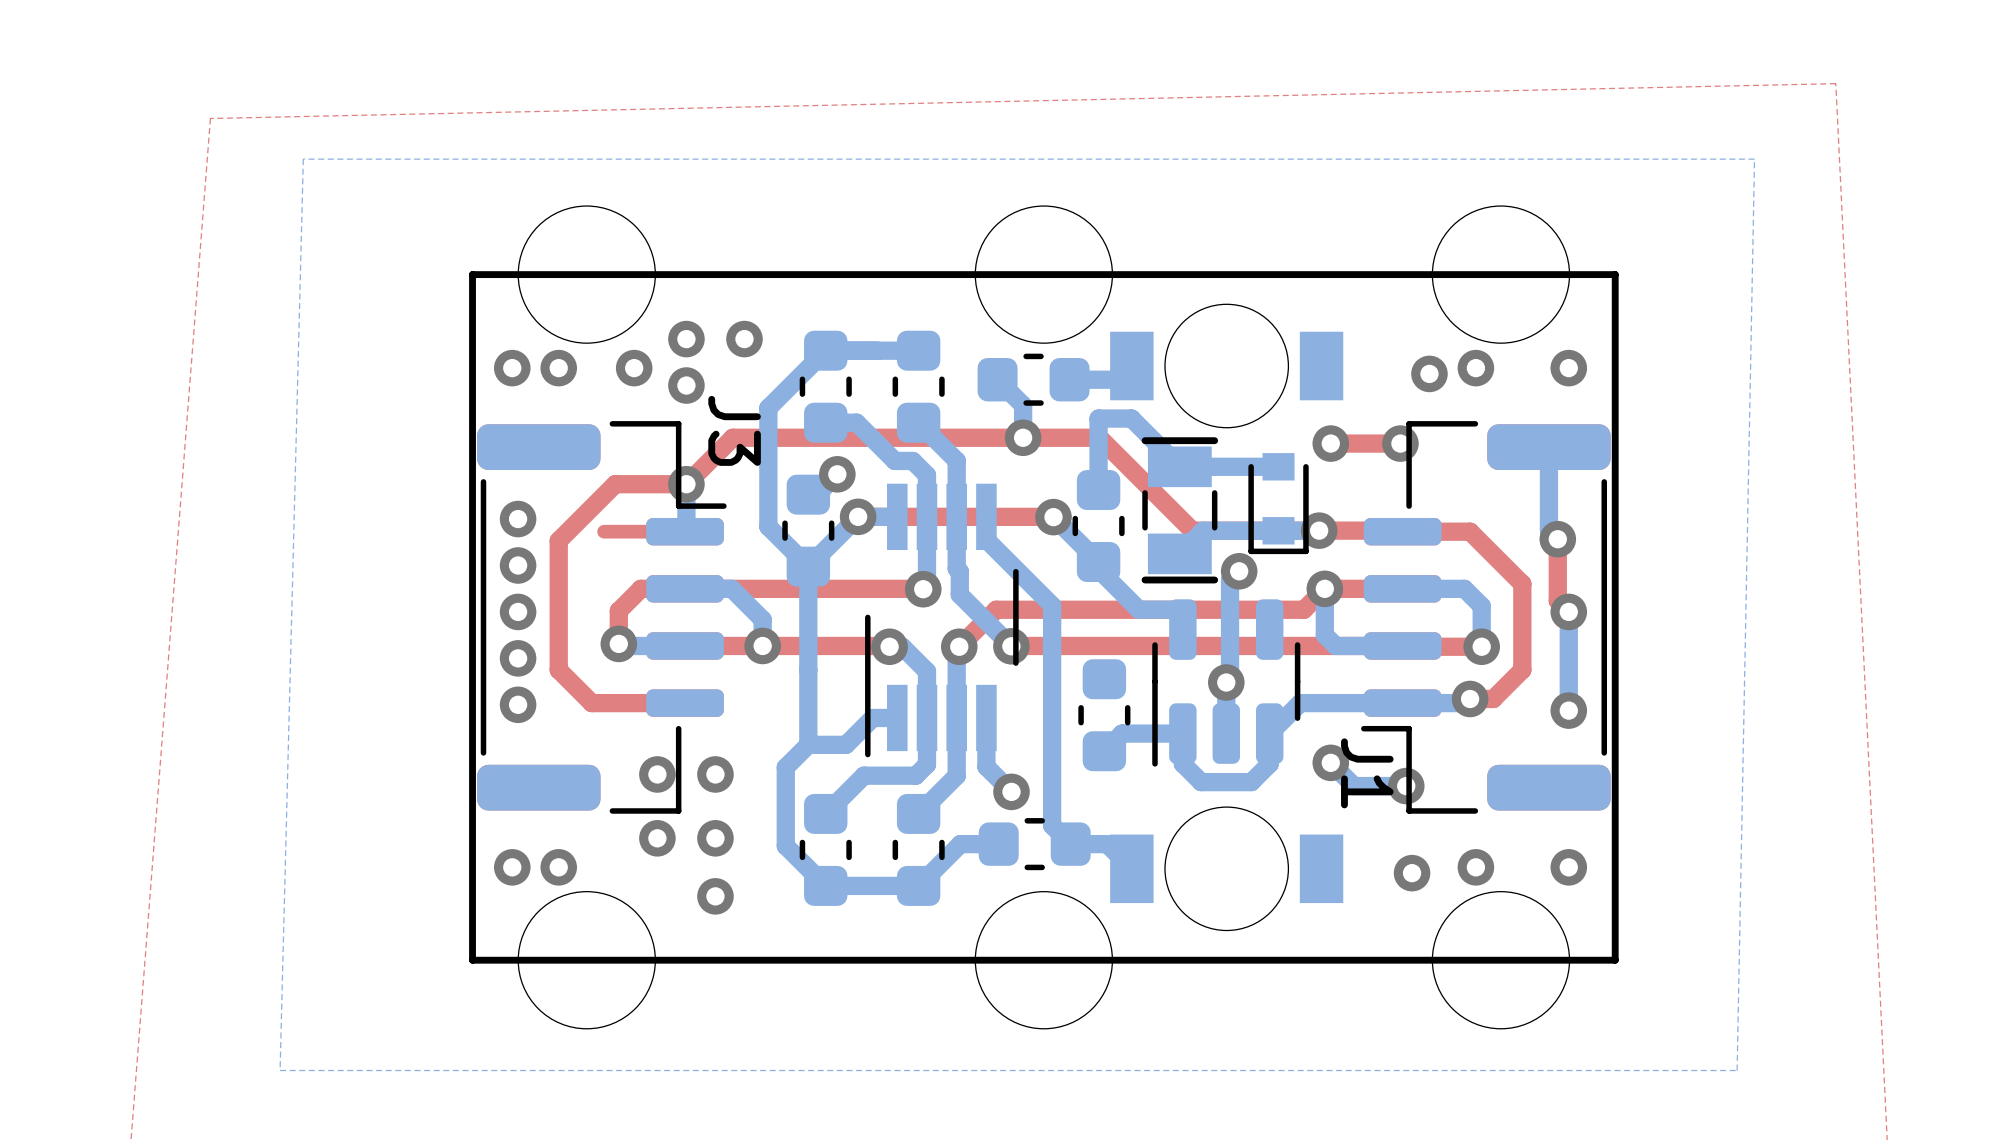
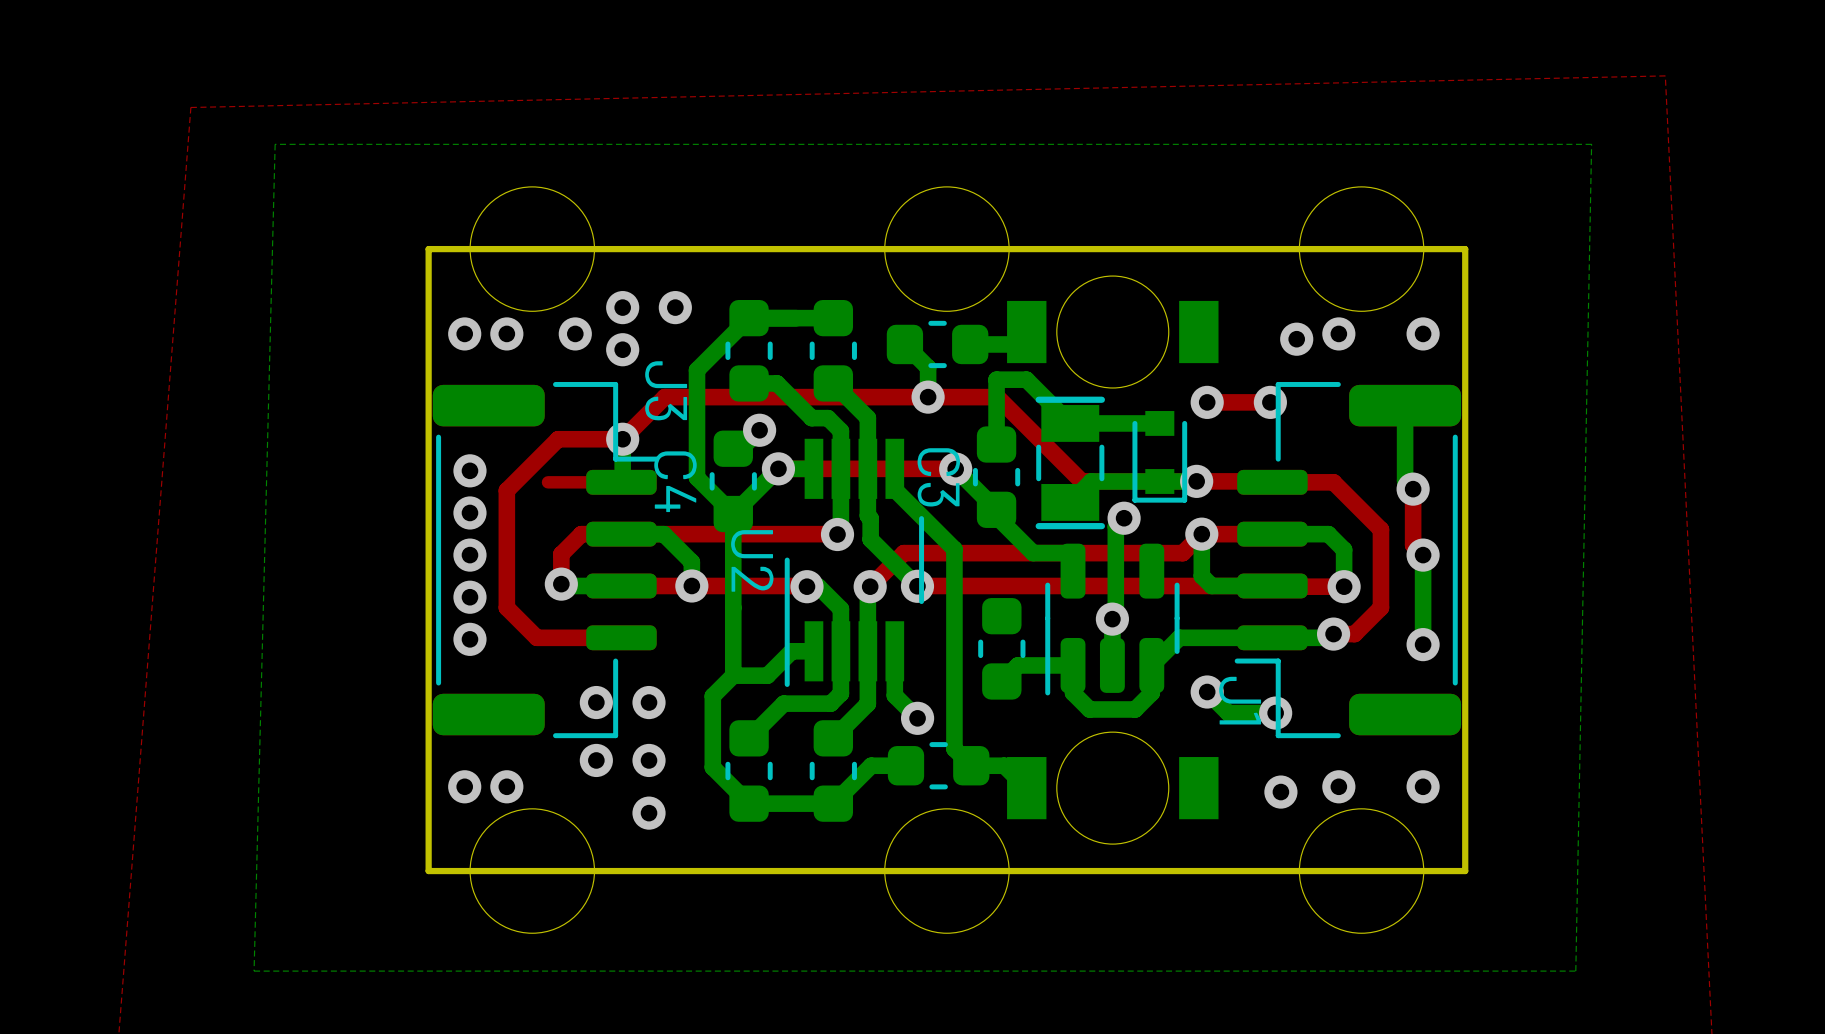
C3 name: none -> C3 (938, 477)
C4 name: none -> C4 (675, 481)
U2 name: none -> U2 (752, 560)

